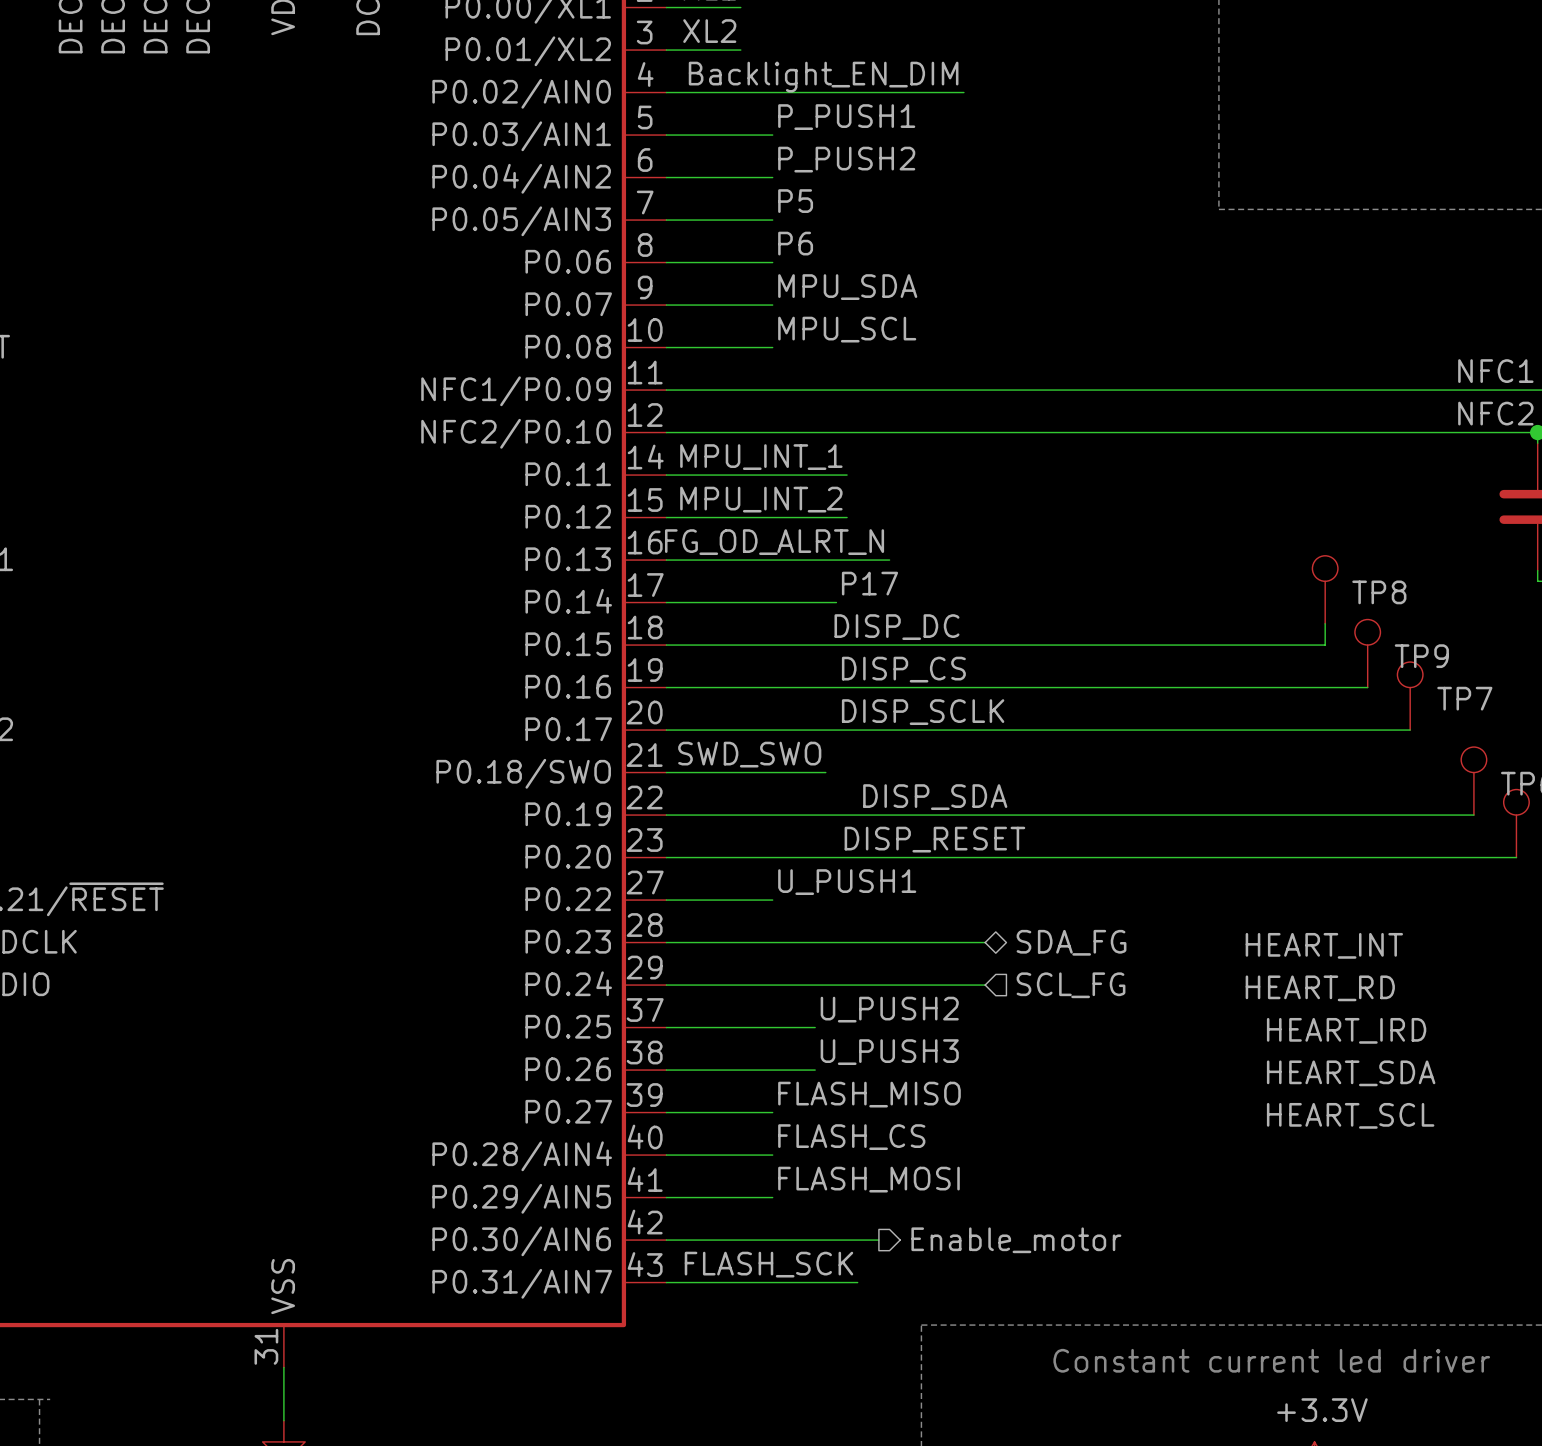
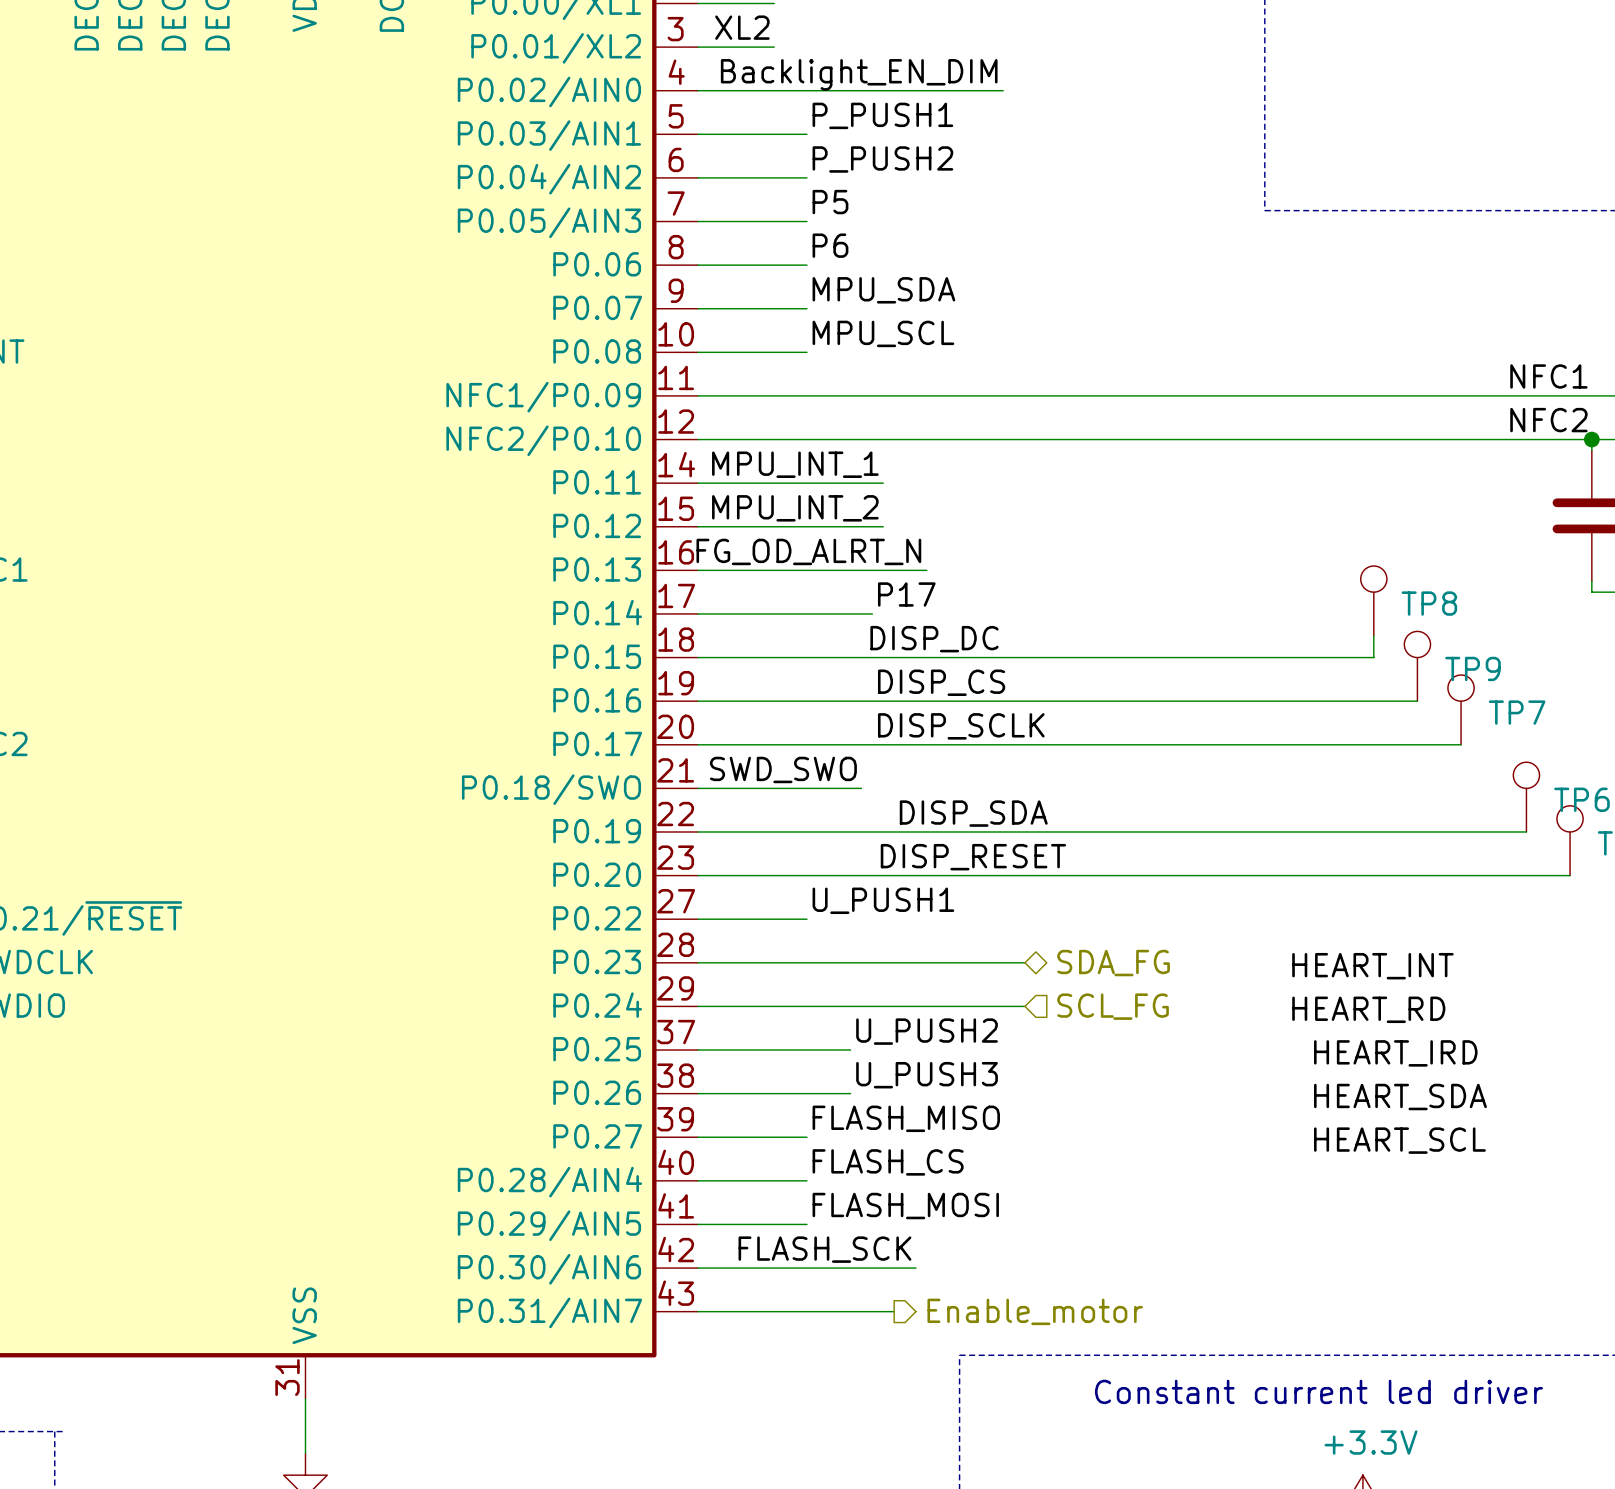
hierarchical label position: Enable_motor (1016, 1240) -> Enable_motor (1035, 1311)
label position: FLASH_SCK (768, 1264) -> FLASH_SCK (824, 1249)

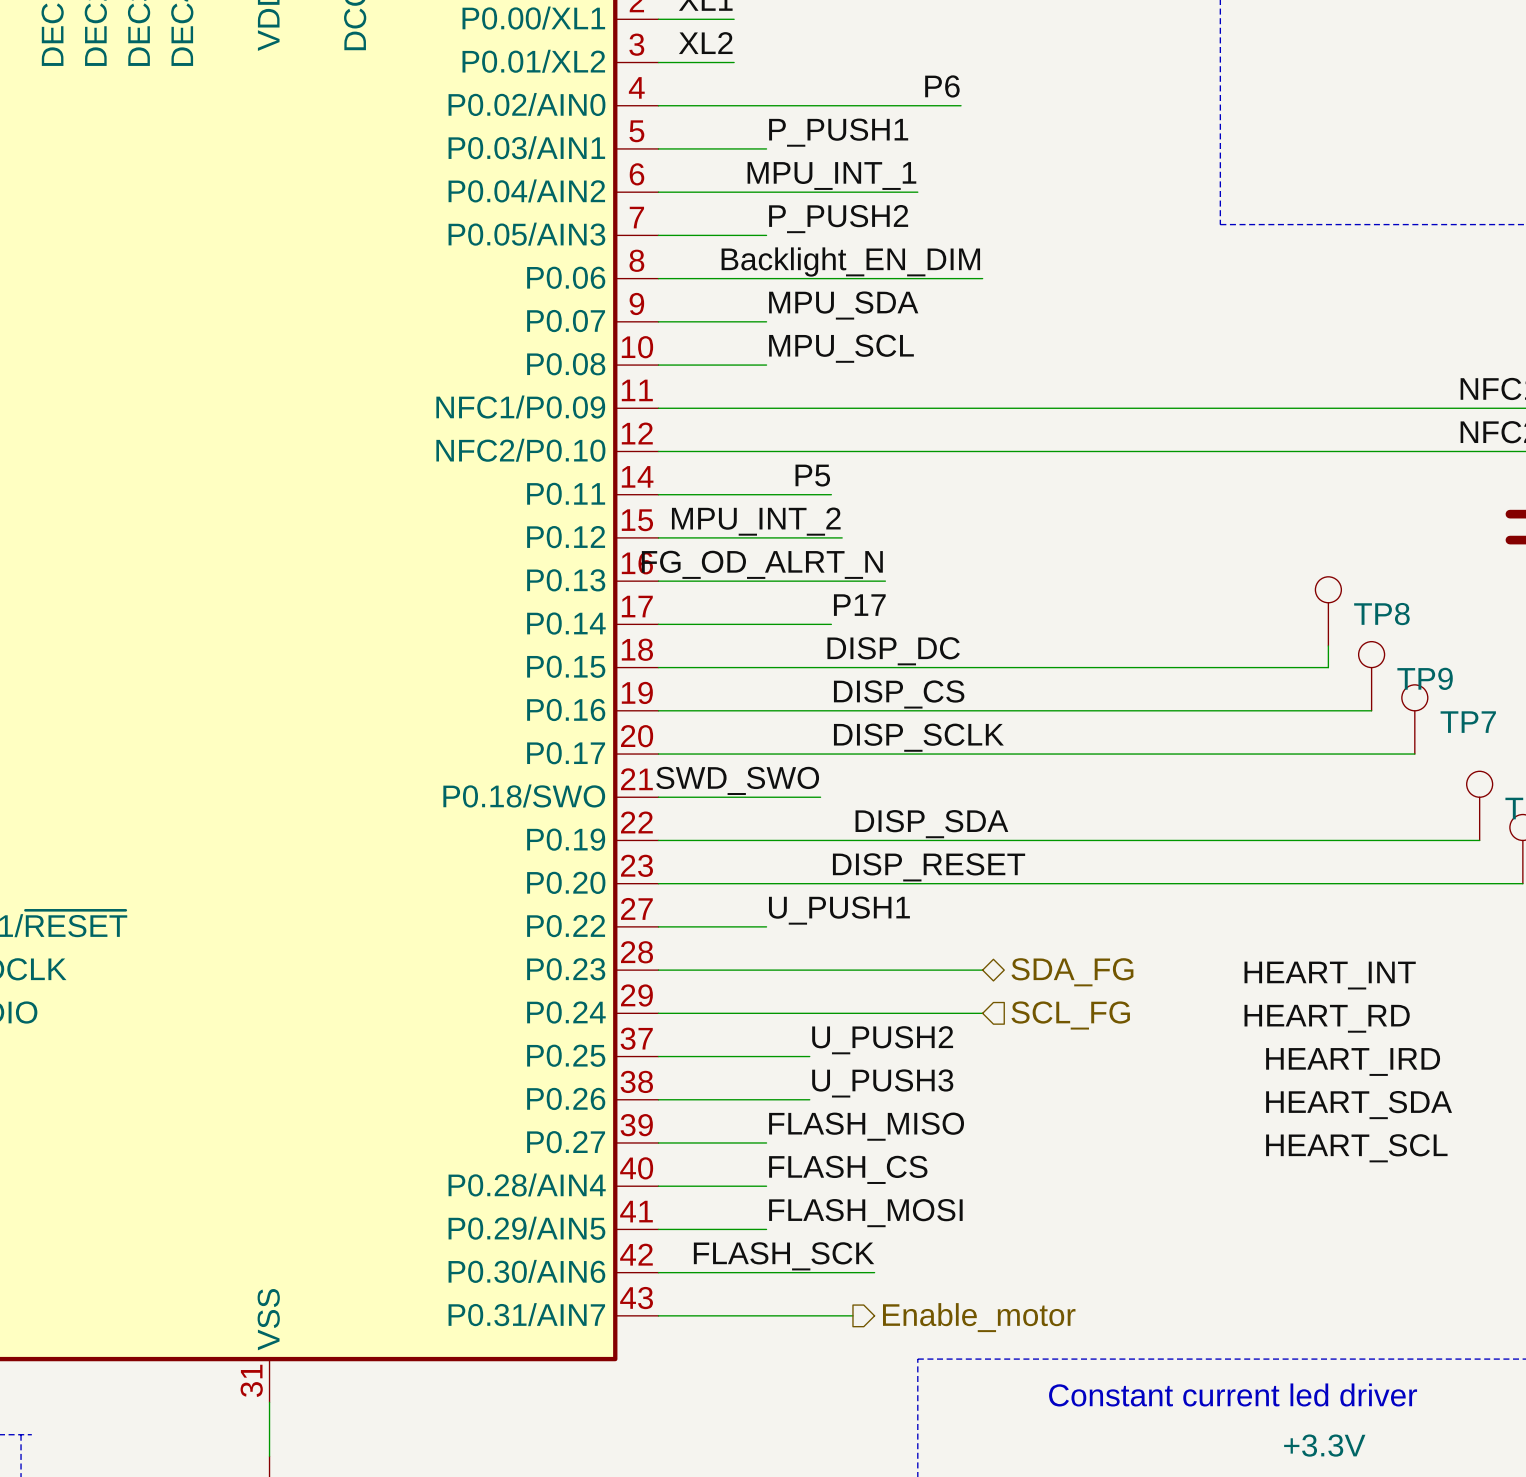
label: Backlight_EN_DIM (859, 74) -> P6 (942, 86)
label: none -> MPU_INT_1 (831, 176)
label: P_PUSH2 (882, 159) -> none
wire: none -> (766, 192) (917, 192)
label: P5 (830, 202) -> P_PUSH2 (838, 219)
label: P6 (830, 245) -> none
label: none -> Backlight_EN_DIM (850, 262)
wire: none -> (766, 278) (982, 278)
label: MPU_INT_1 (795, 464) -> P5 (812, 475)
wire: (872, 483) (883, 483) -> none

